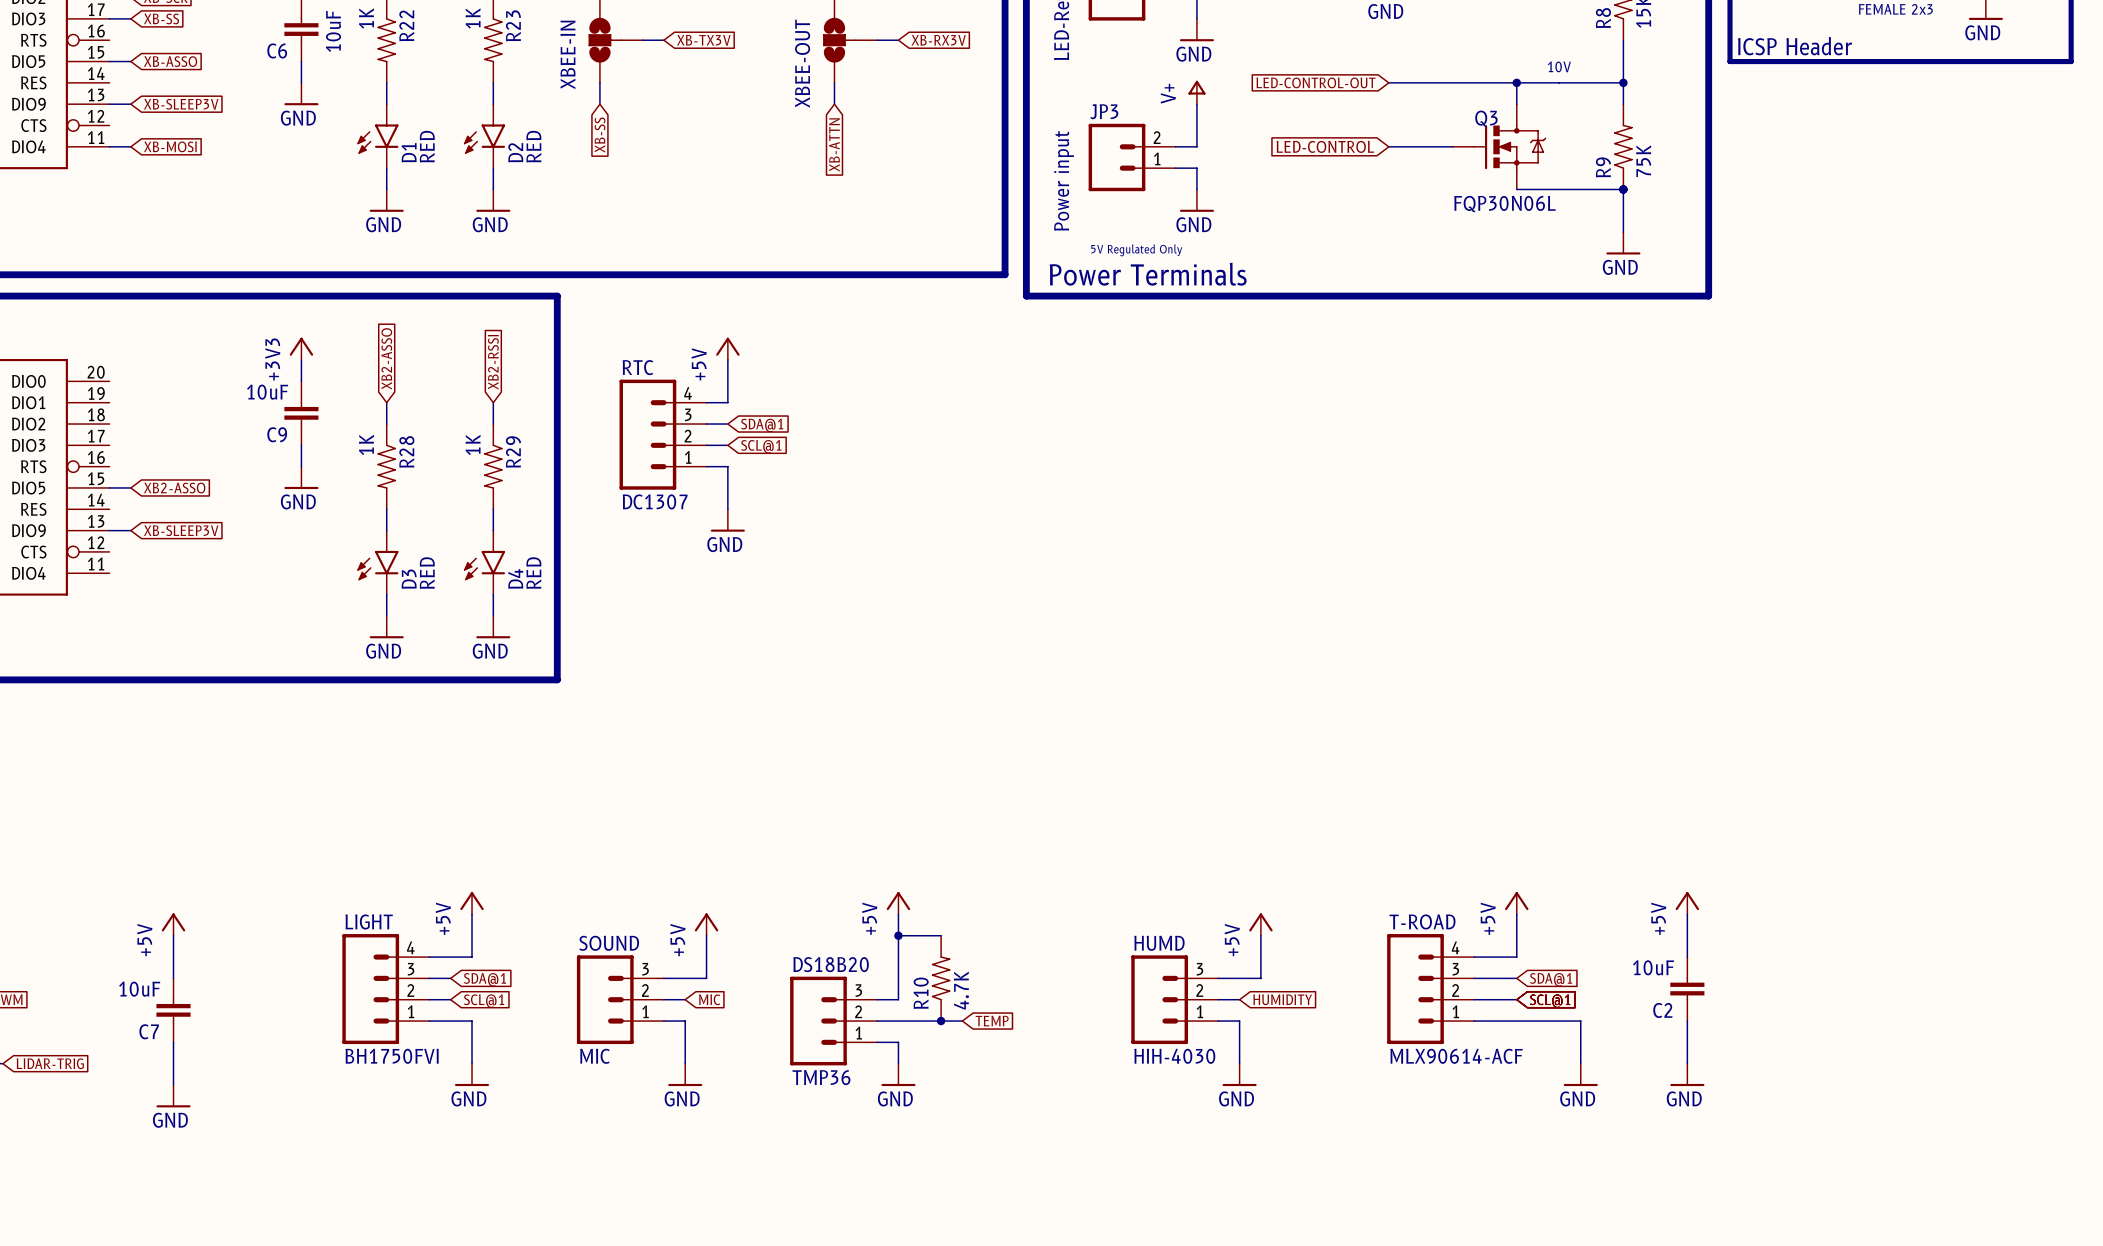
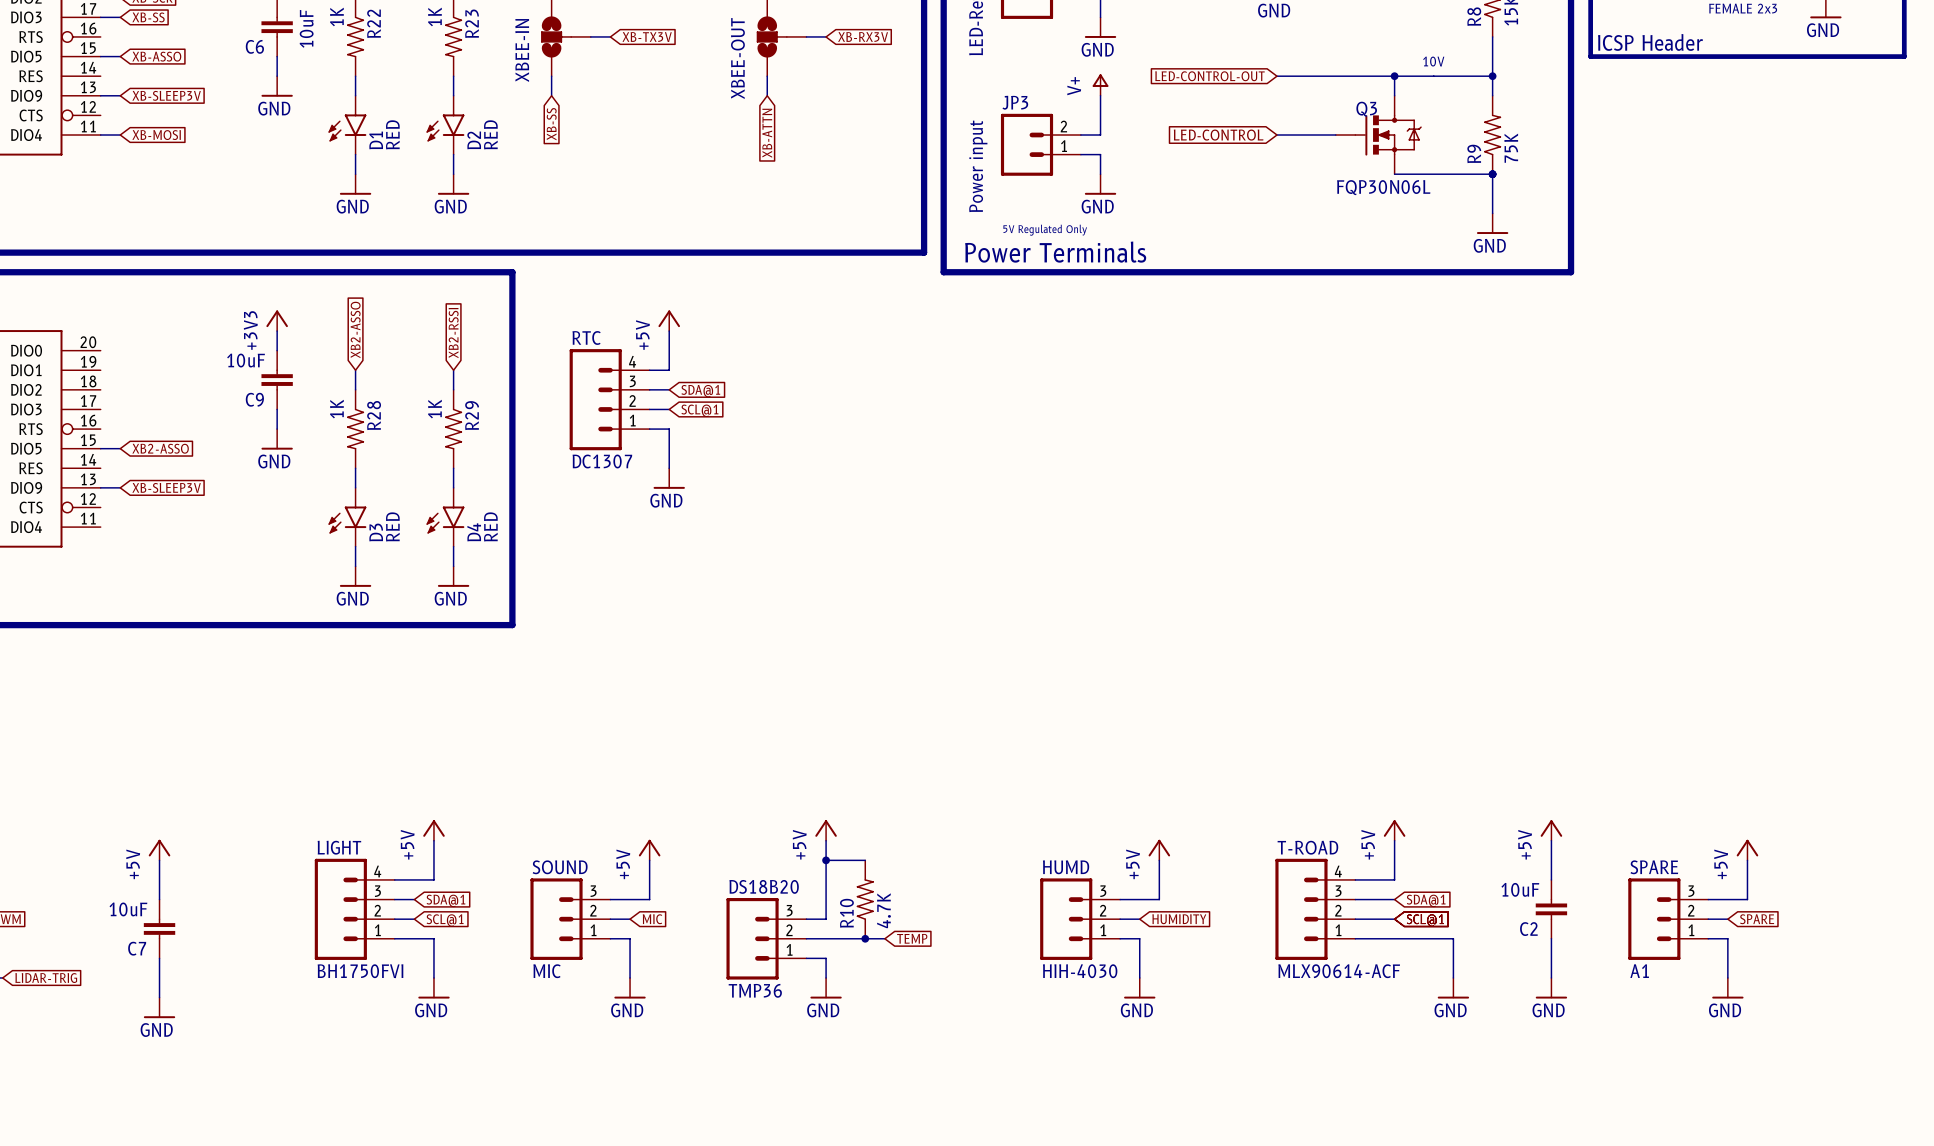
power symbol: none -> +5V (1747, 850)
wire: none -> (1747, 860) (1747, 899) (1708, 899)
SPARE: none -> A1 (1668, 919)
wire: none -> (1708, 919) (1727, 919)
global label: none -> SPARE (1757, 919)
wire: none -> (1708, 938) (1727, 938) (1727, 977)
power symbol: none -> GND (1727, 988)

